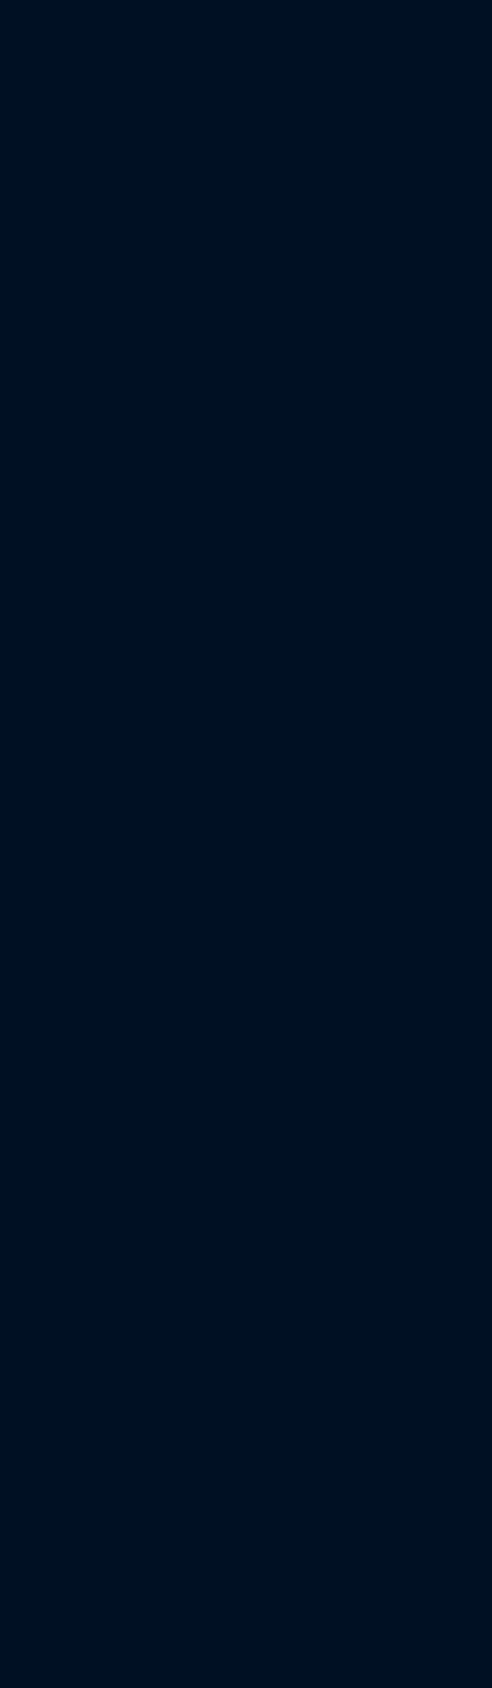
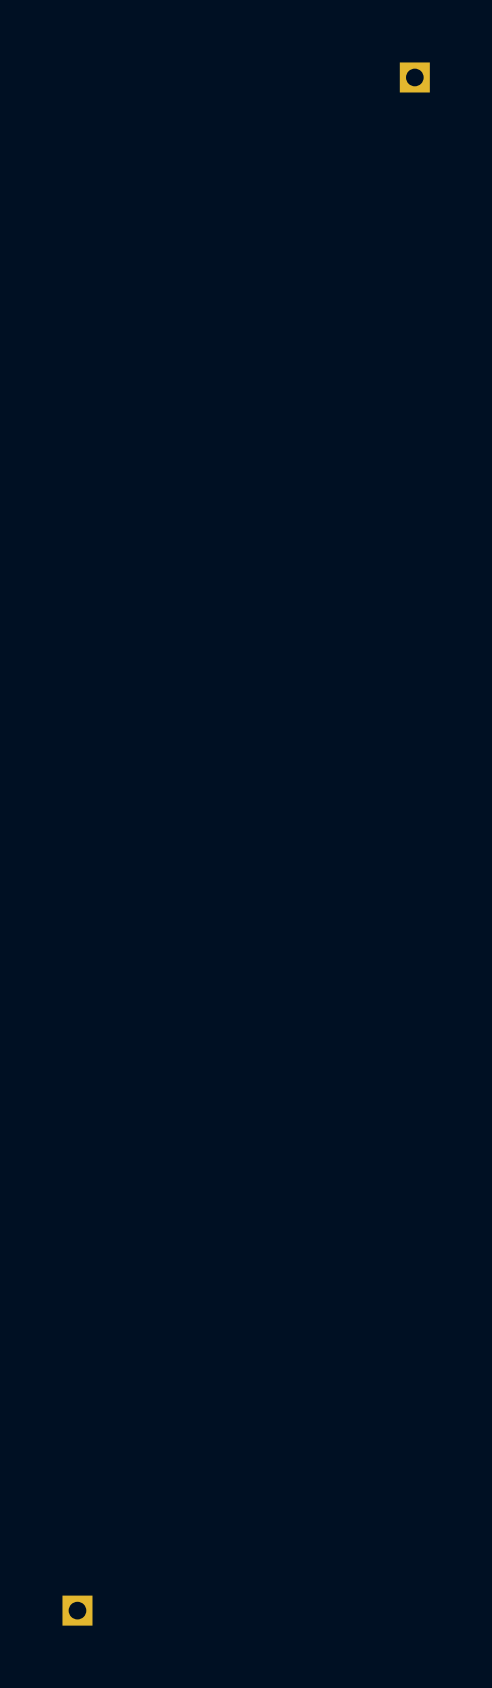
part: none -> (414, 77)
part: none -> (77, 1610)

